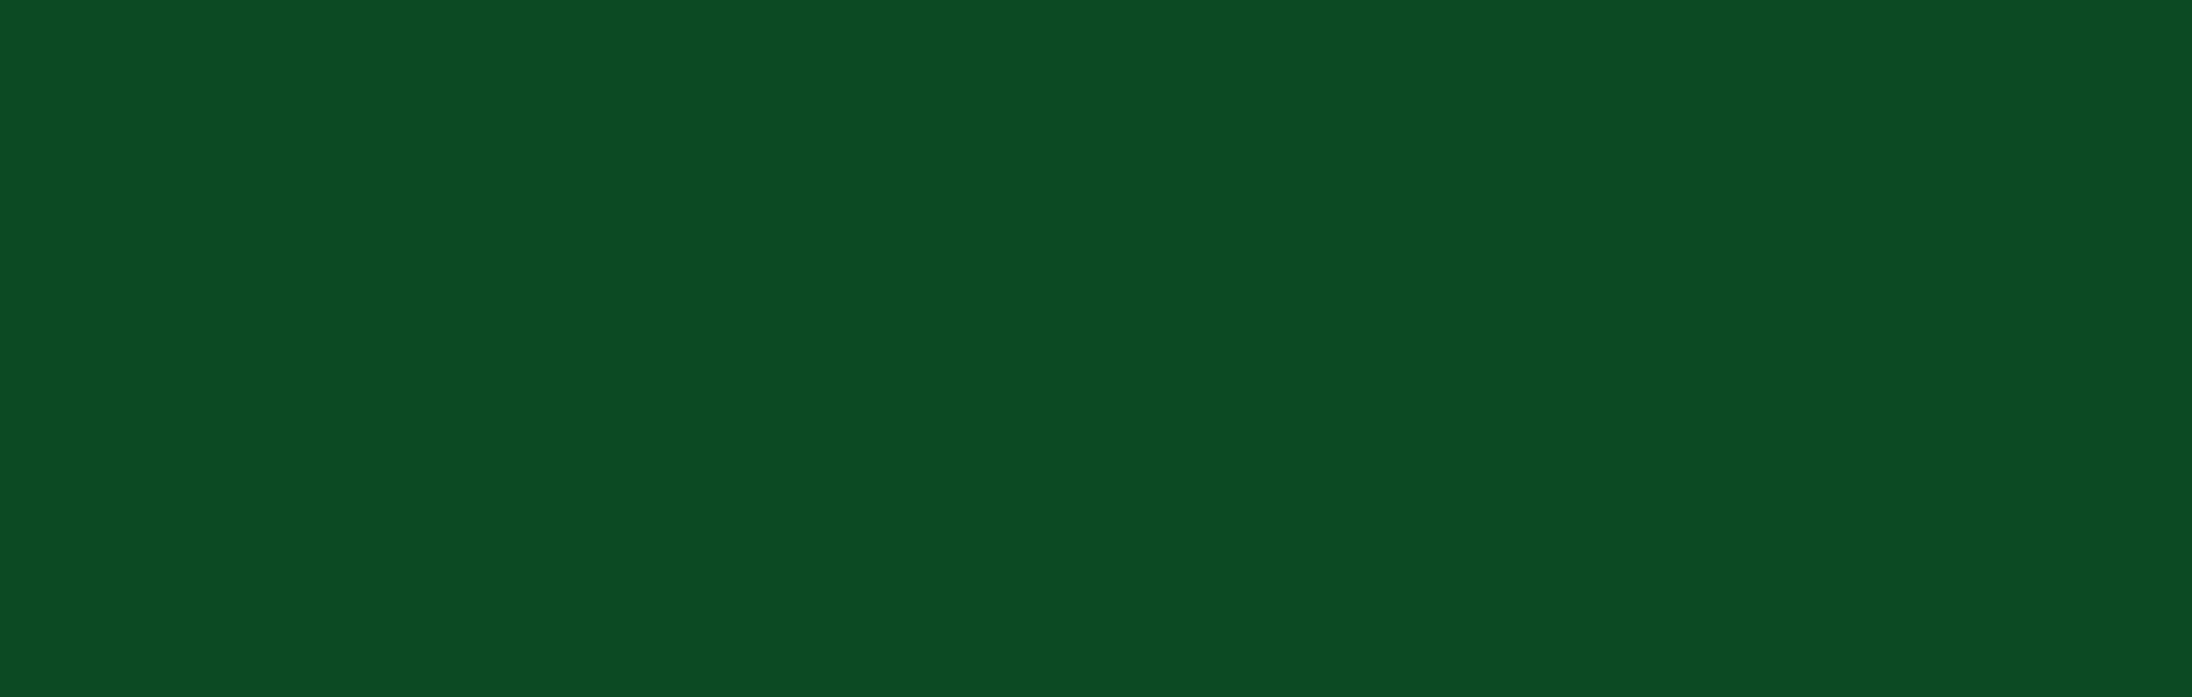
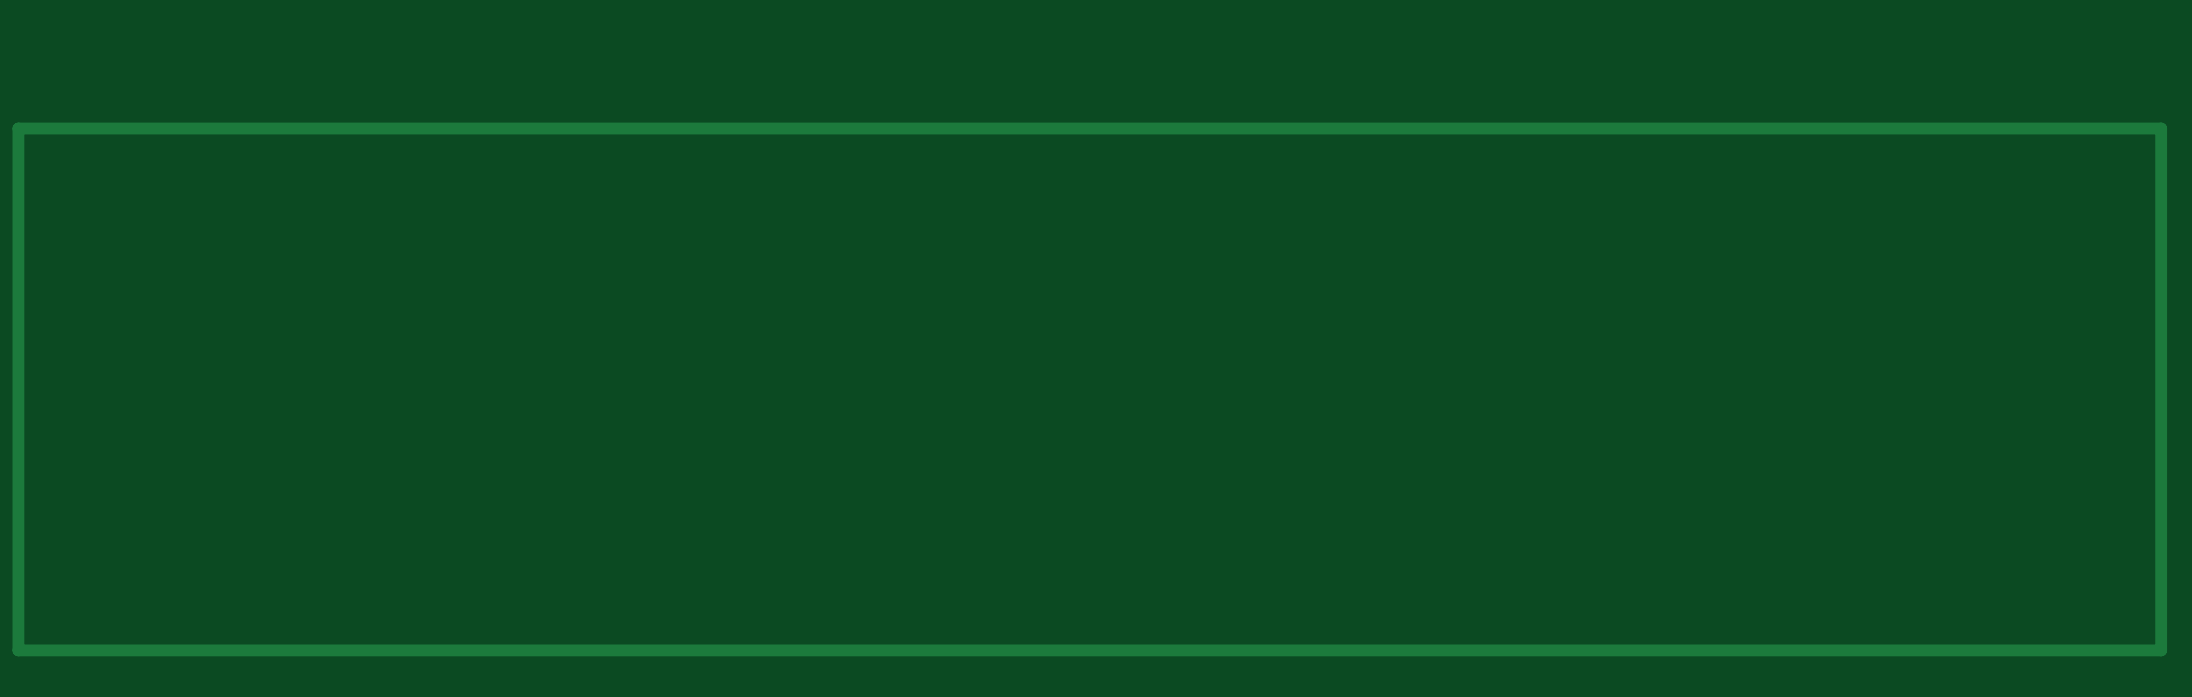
track: none -> (2161, 128) (18, 128) (18, 650) (2161, 650) (2161, 128)

